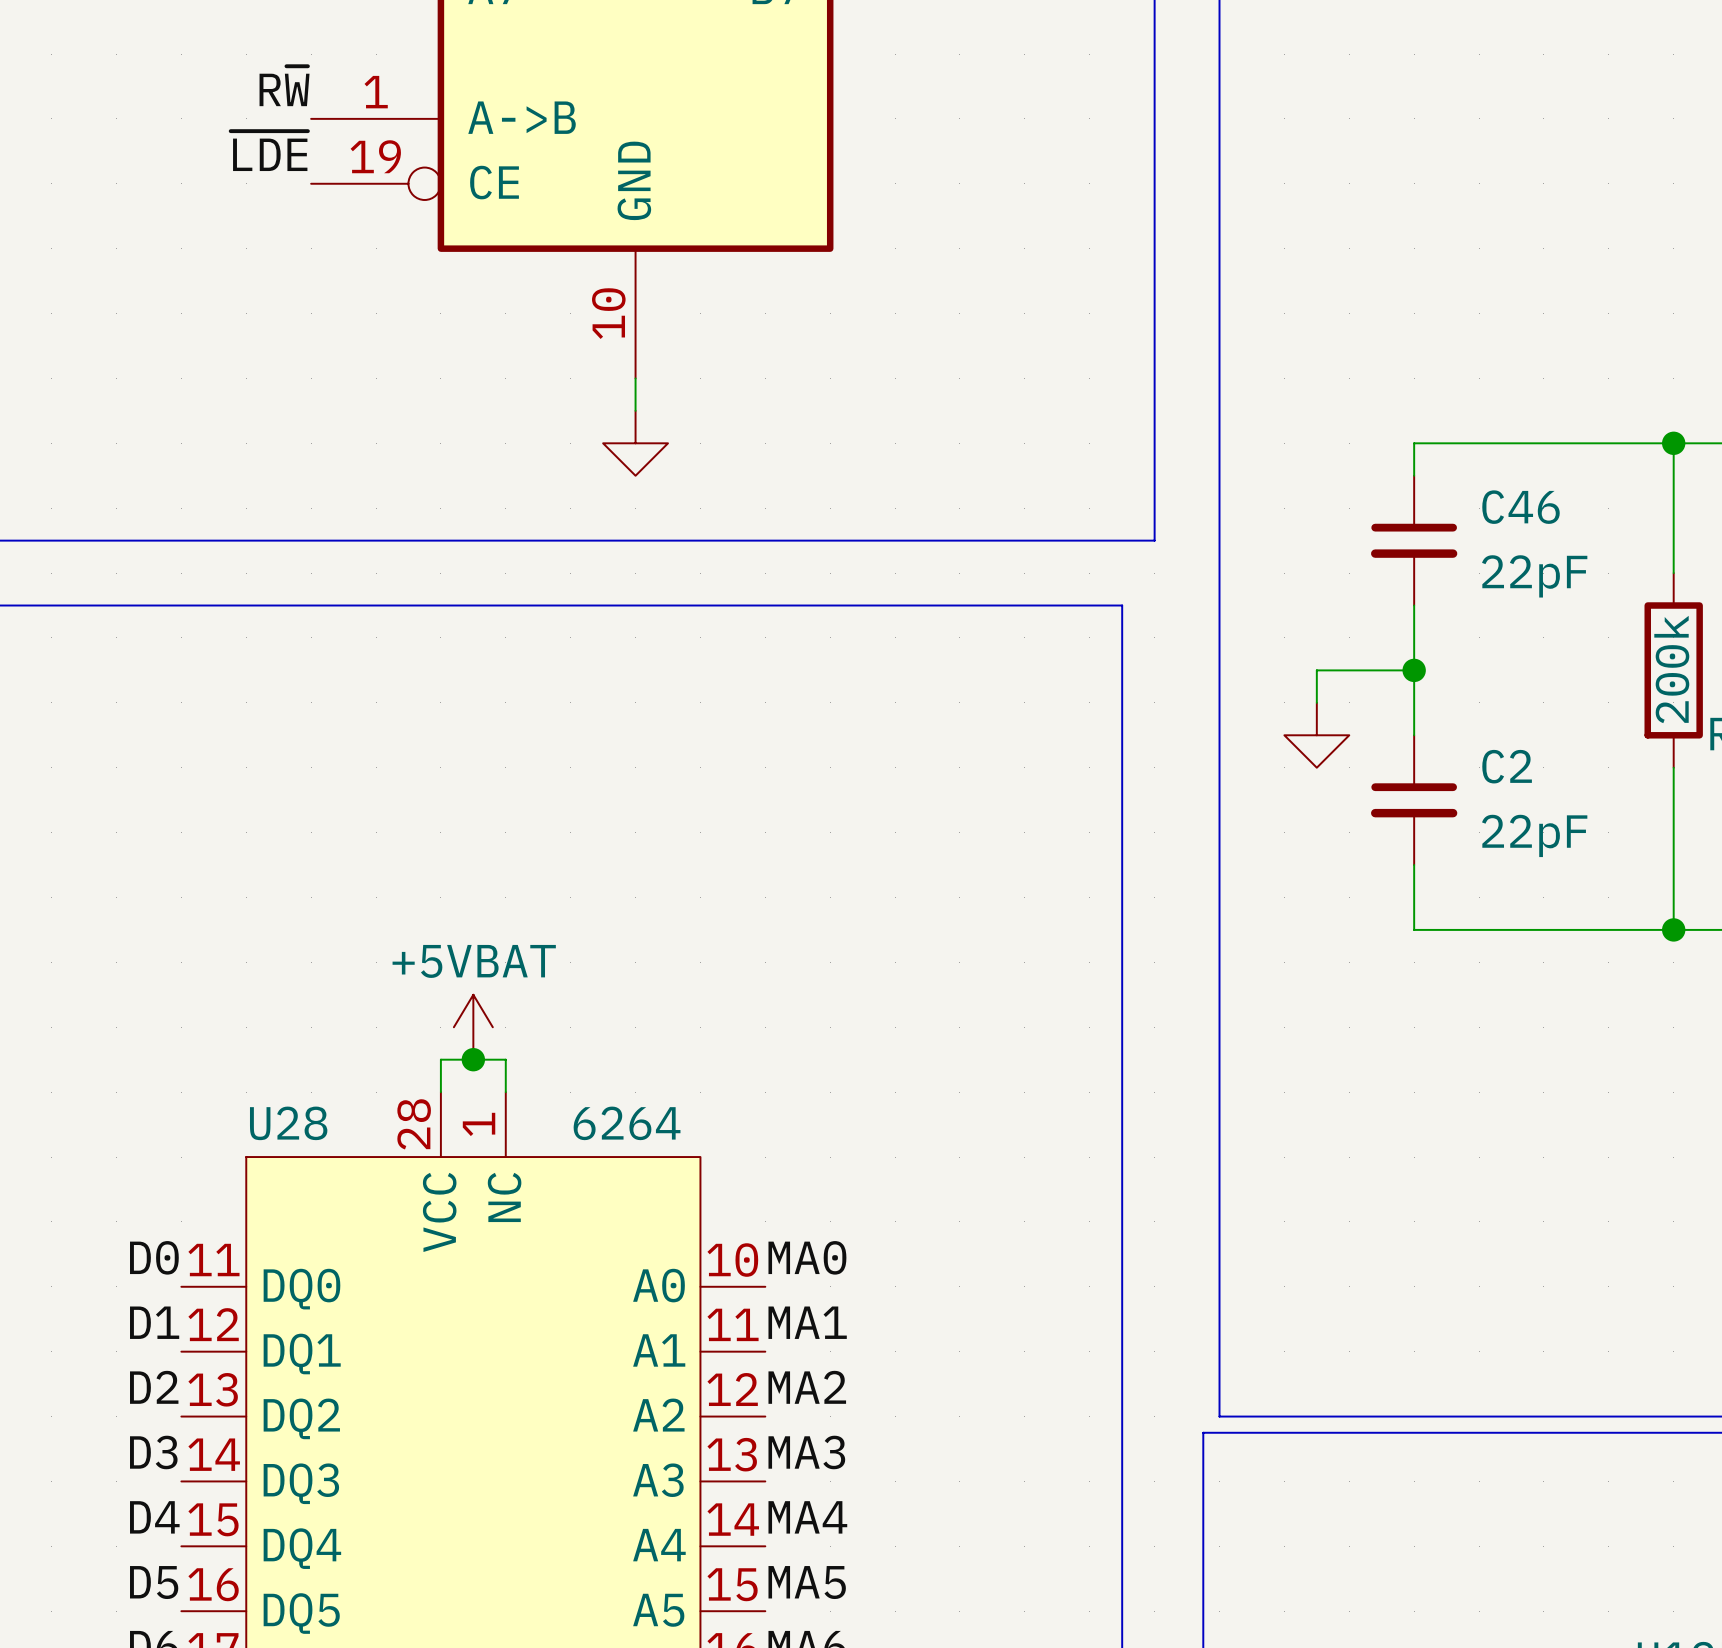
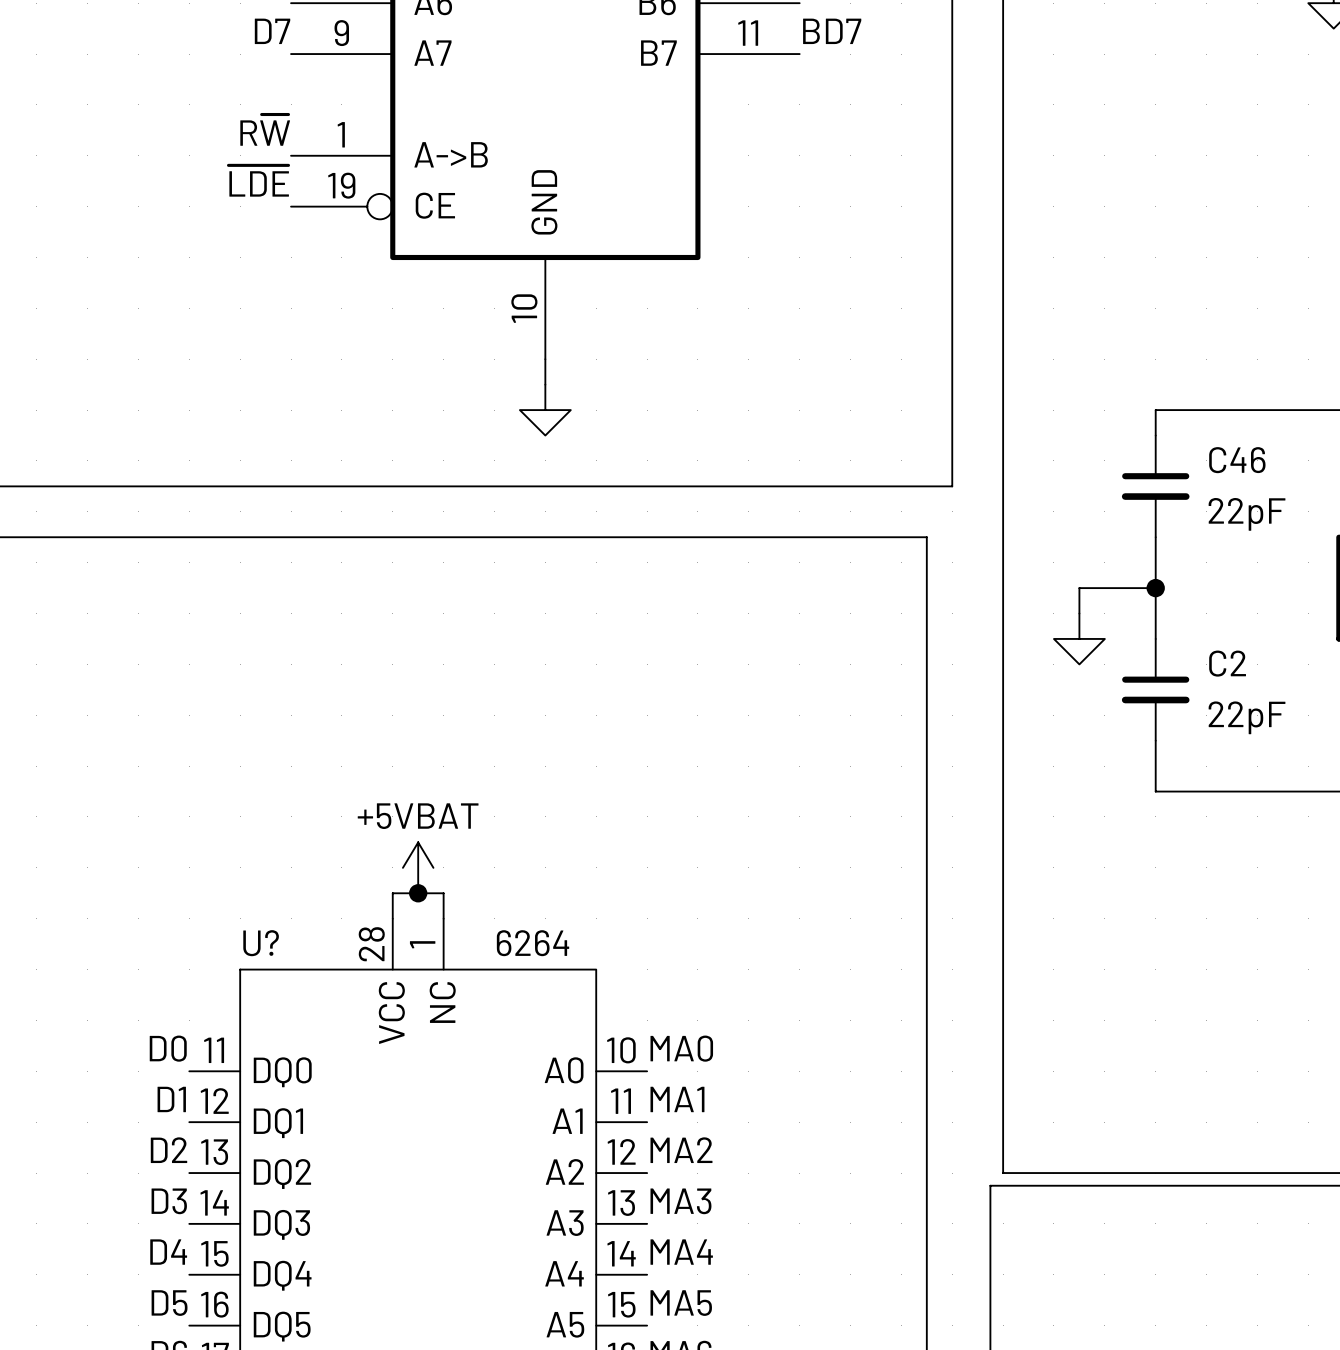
U28 name: U28 (288, 1123) -> U? (261, 943)

